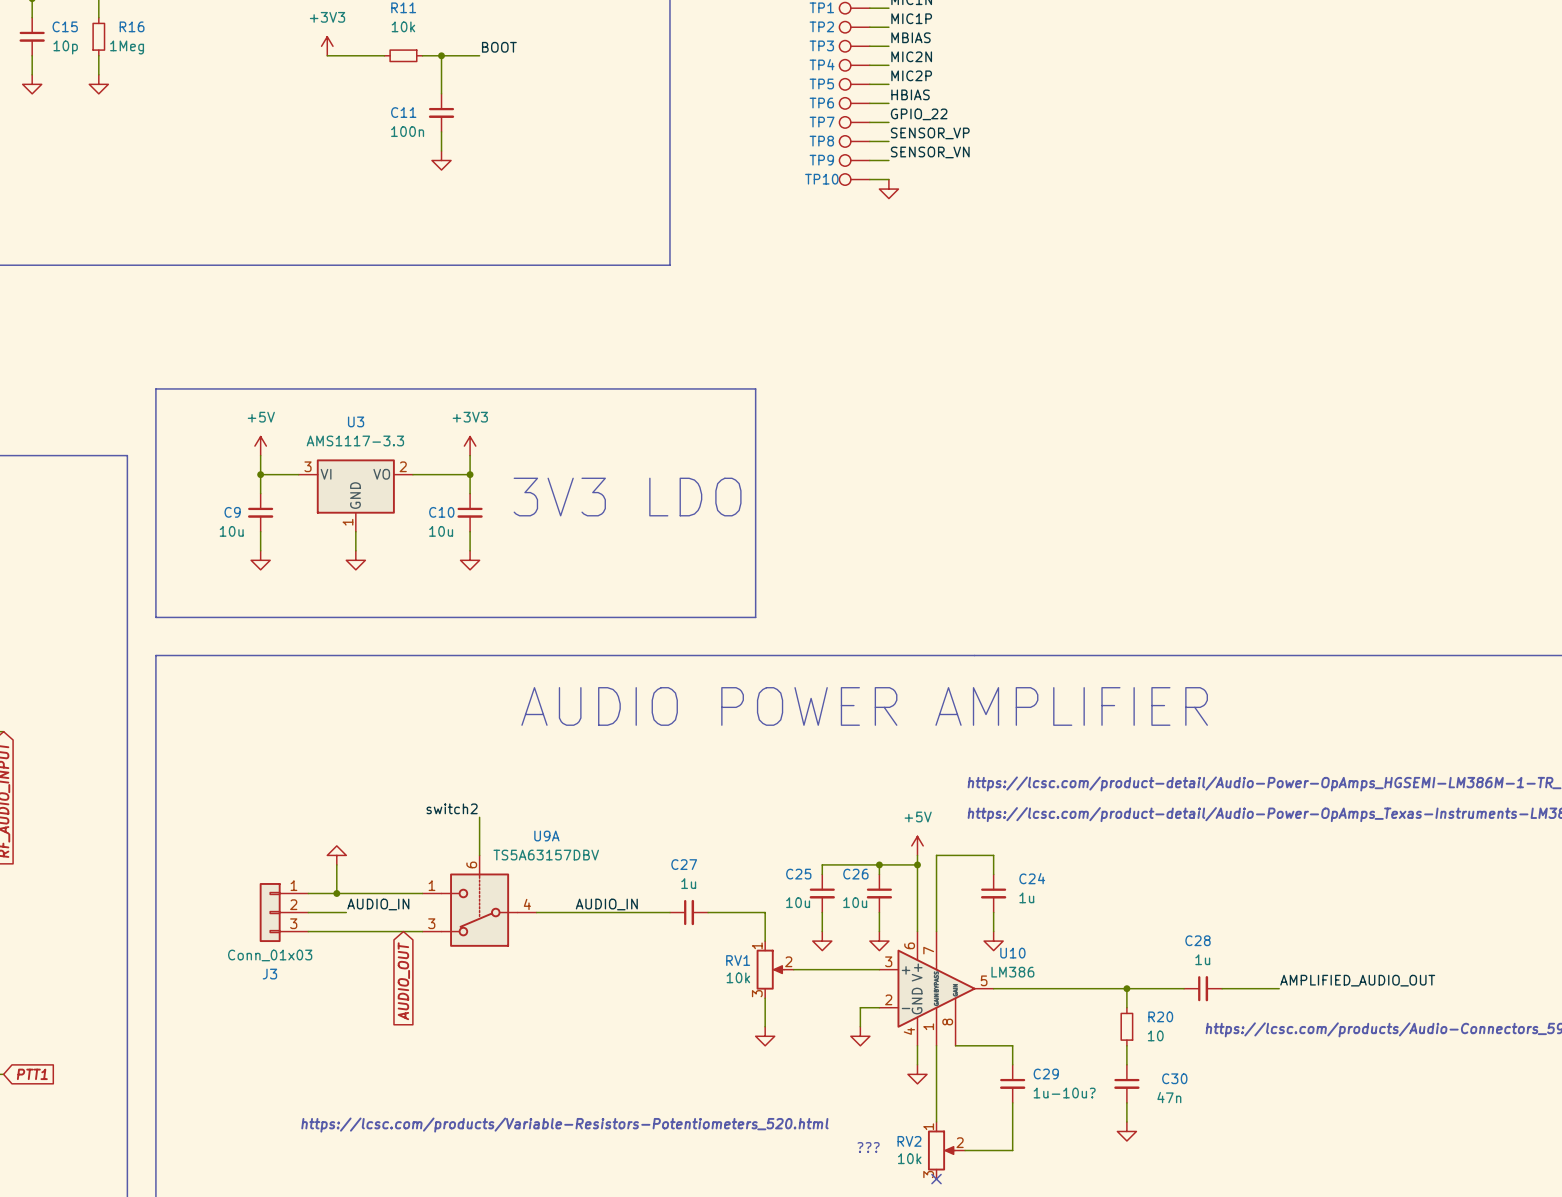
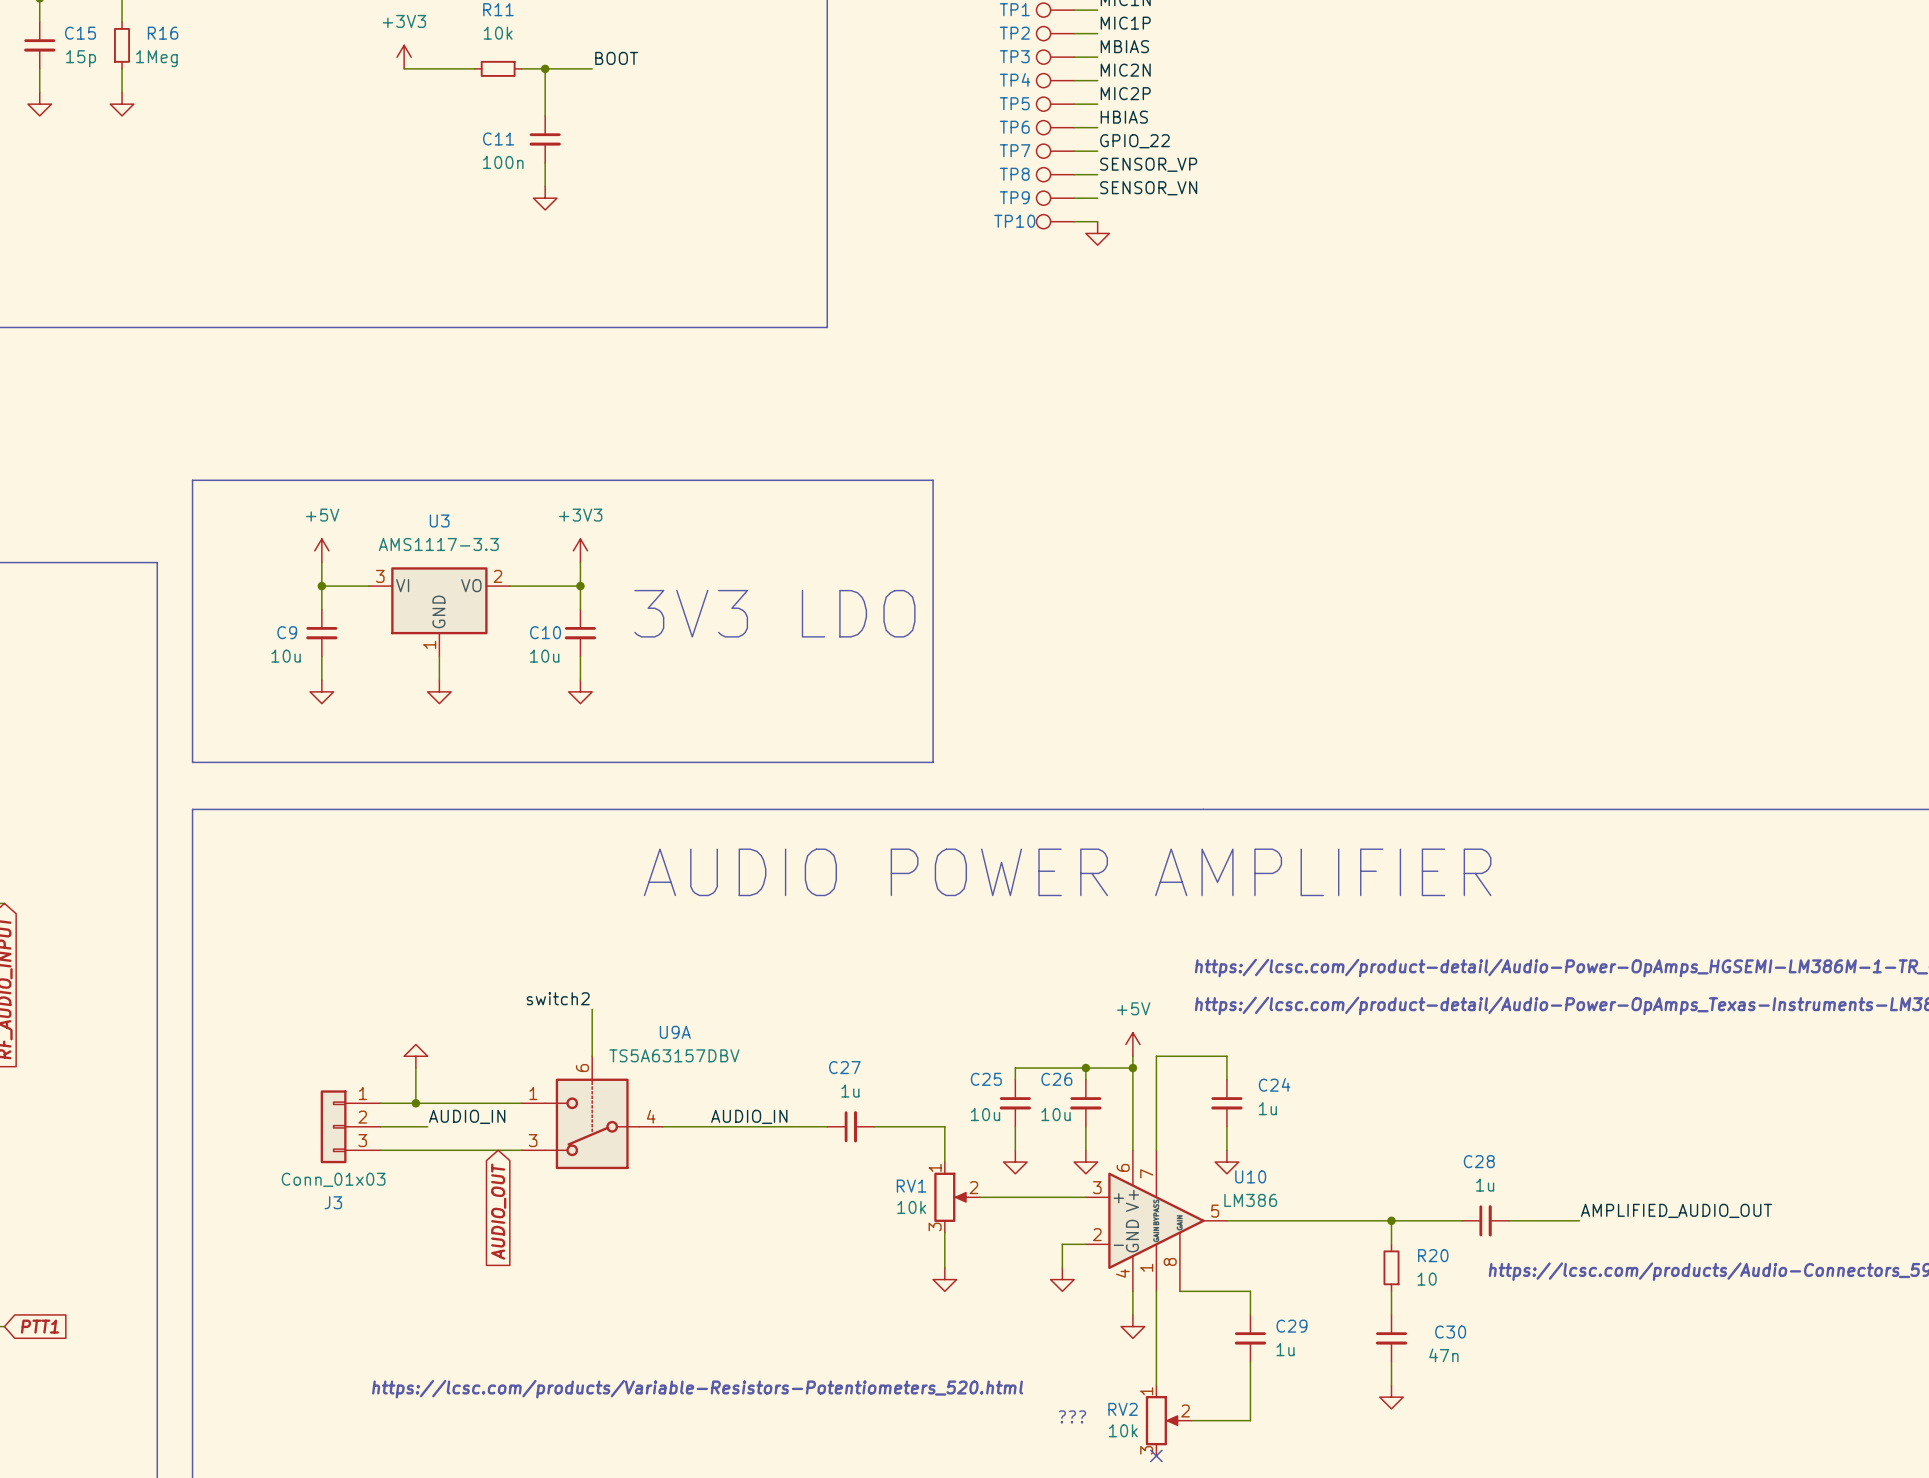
C15 value: 10p (65, 47) -> 15p (81, 58)
C29 value: 1u-10u? (1064, 1093) -> 1u (1285, 1349)

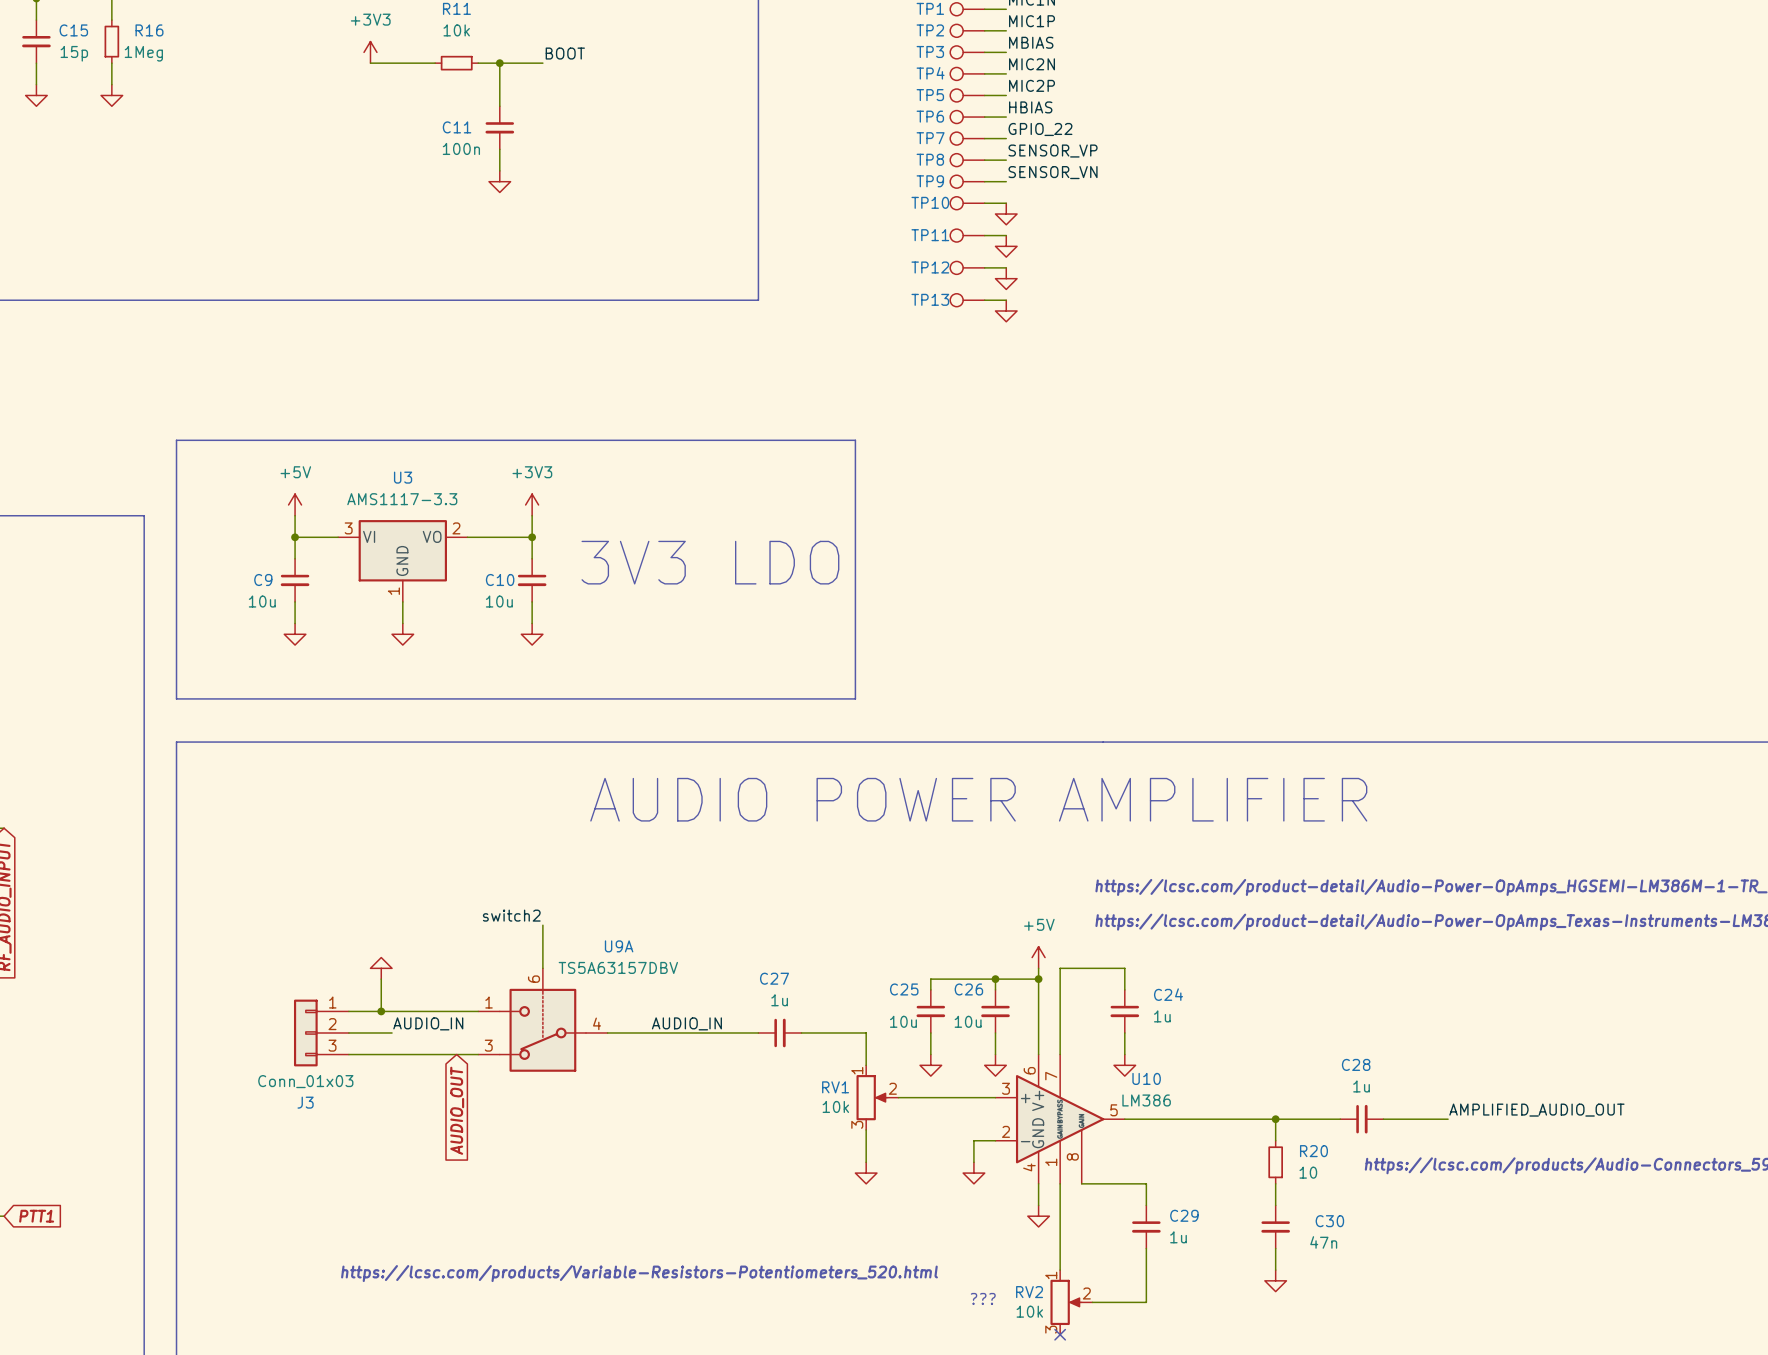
TP11: none -> (967, 235)
wire: none -> (984, 235) (1006, 235)
power symbol: none -> (1006, 246)
TP12: none -> (967, 267)
wire: none -> (984, 267) (1006, 267)
power symbol: none -> (1006, 278)
TP13: none -> (967, 300)
wire: none -> (984, 300) (1006, 300)
power symbol: none -> (1006, 311)

